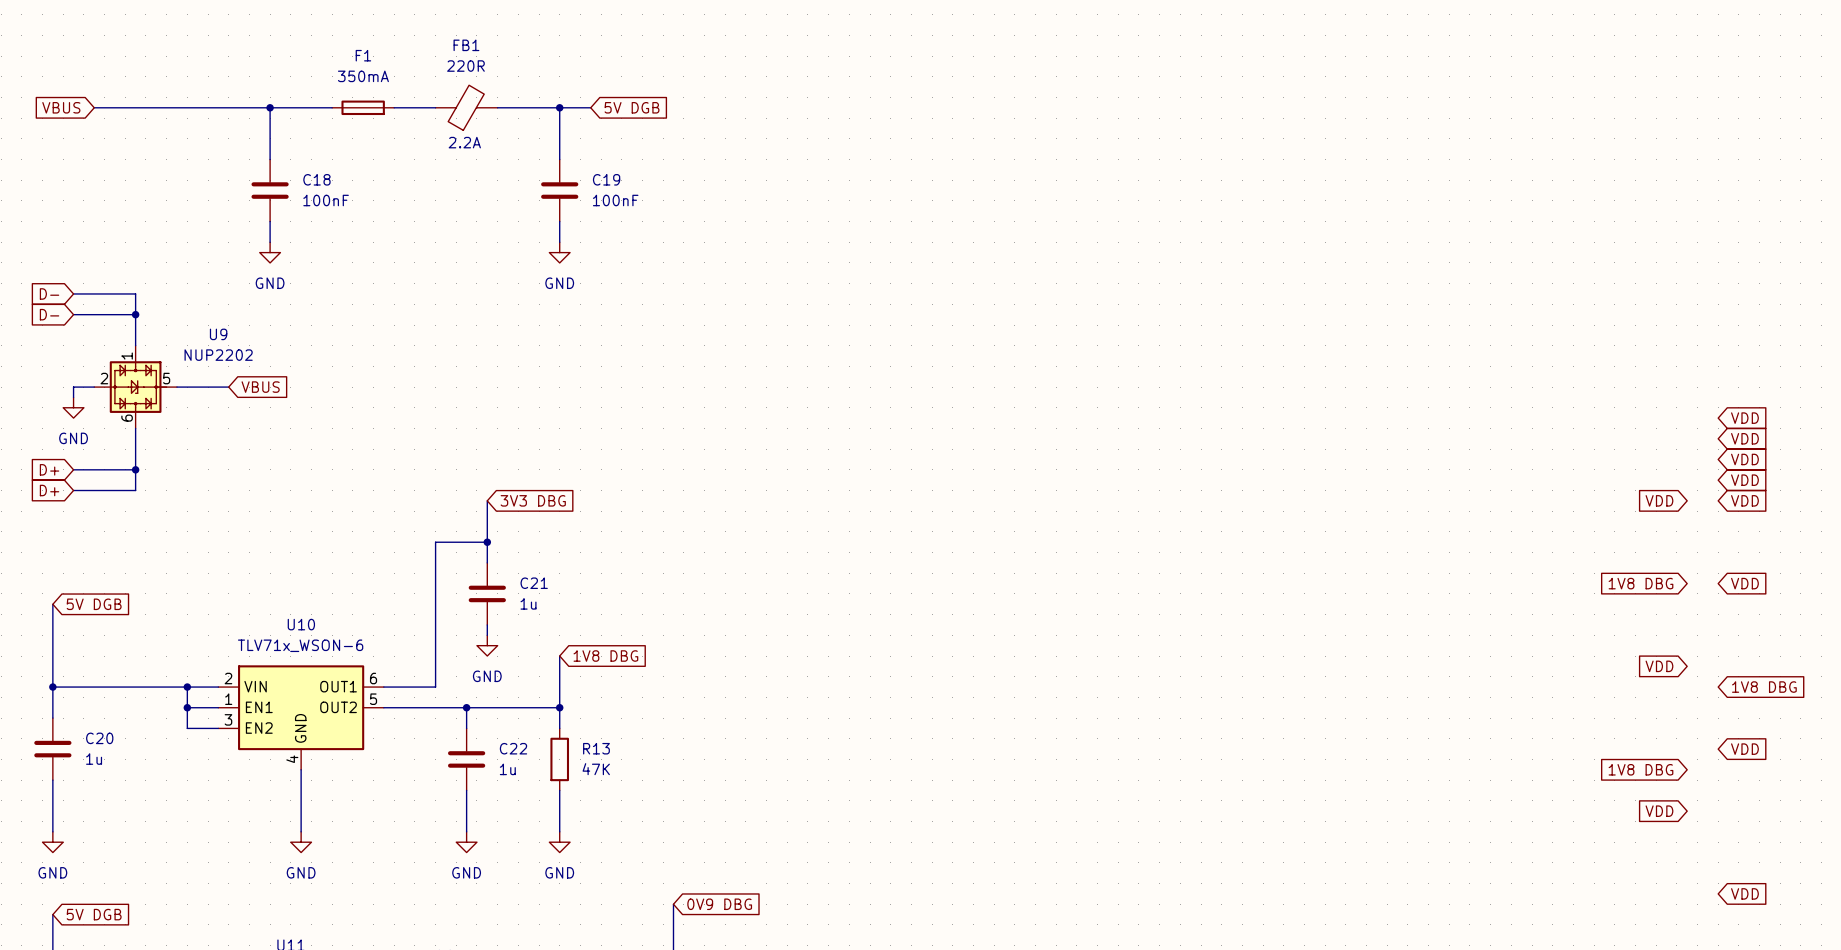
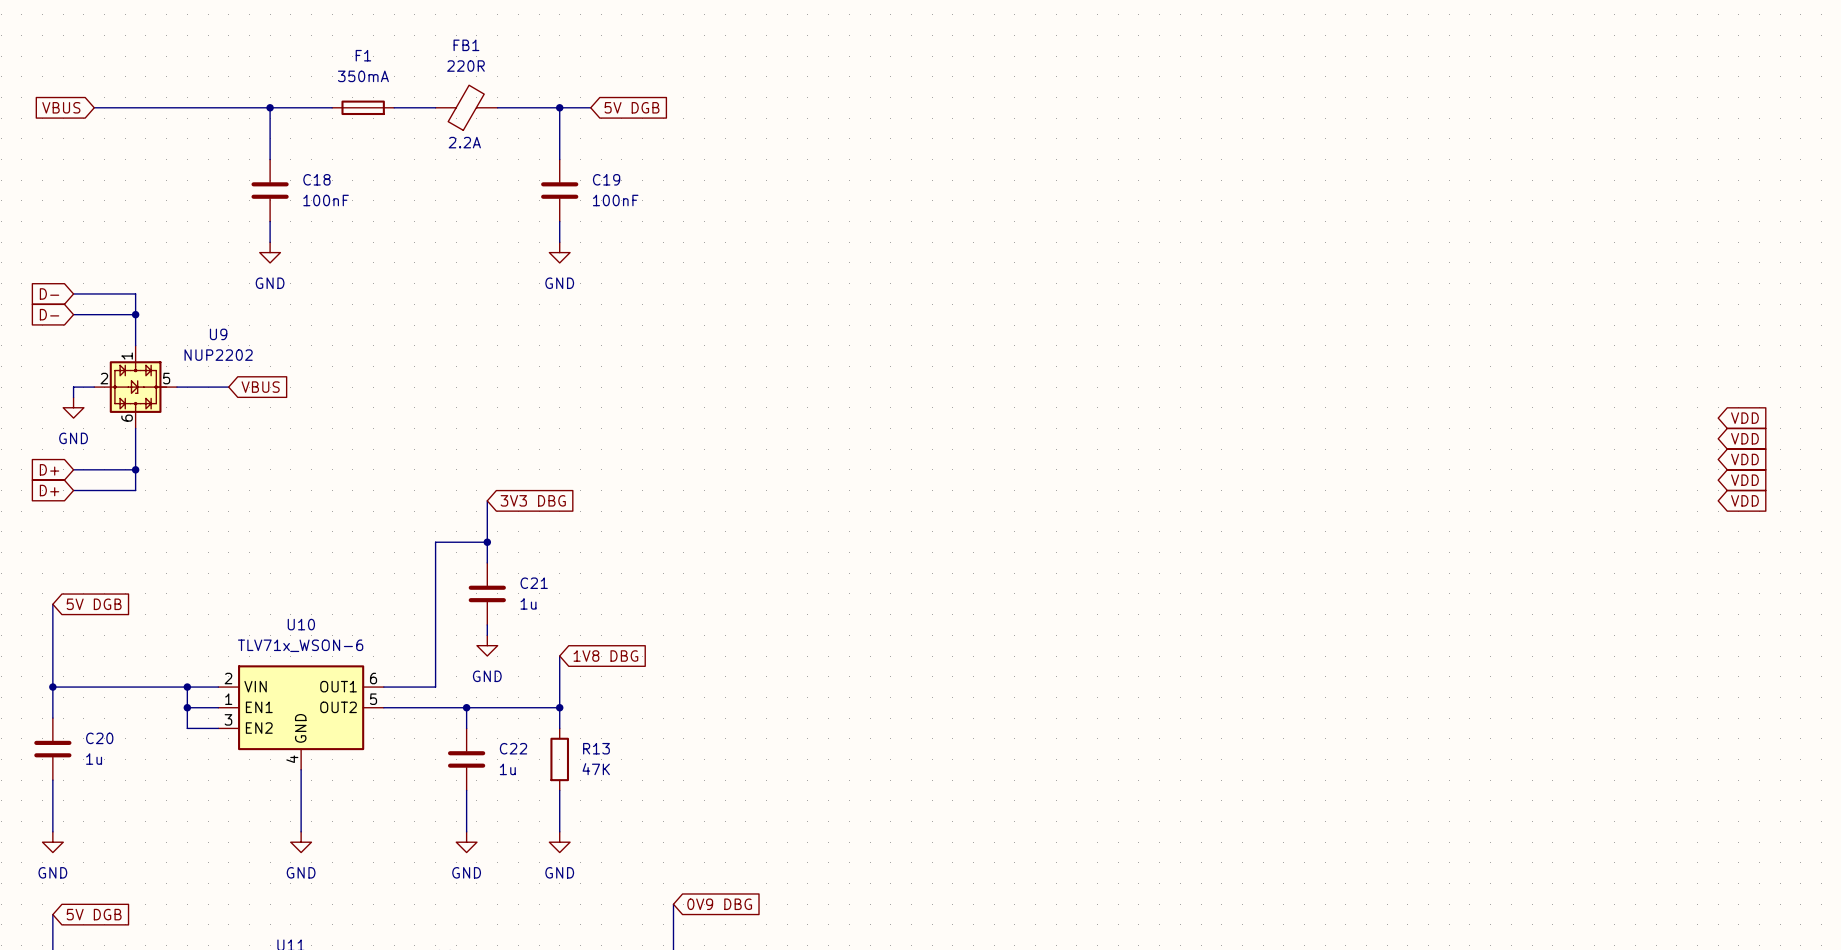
global label: VDD (1659, 500) -> none
global label: 1V8 DBG (1640, 583) -> none
global label: VDD (1744, 583) -> none
global label: VDD (1659, 666) -> none
global label: 1V8 DBG (1764, 687) -> none
global label: VDD (1744, 749) -> none
global label: 1V8 DBG (1640, 769) -> none
global label: VDD (1659, 811) -> none
global label: VDD (1744, 893) -> none

